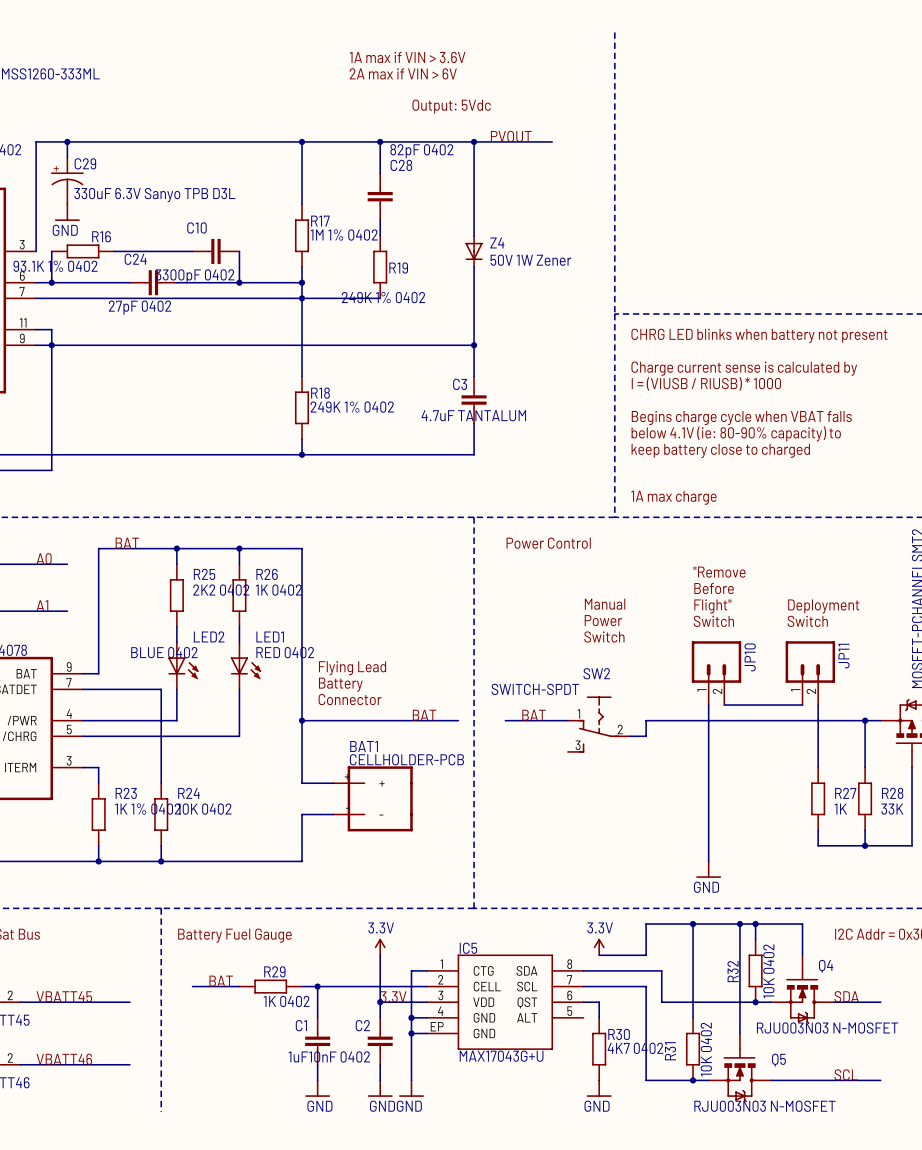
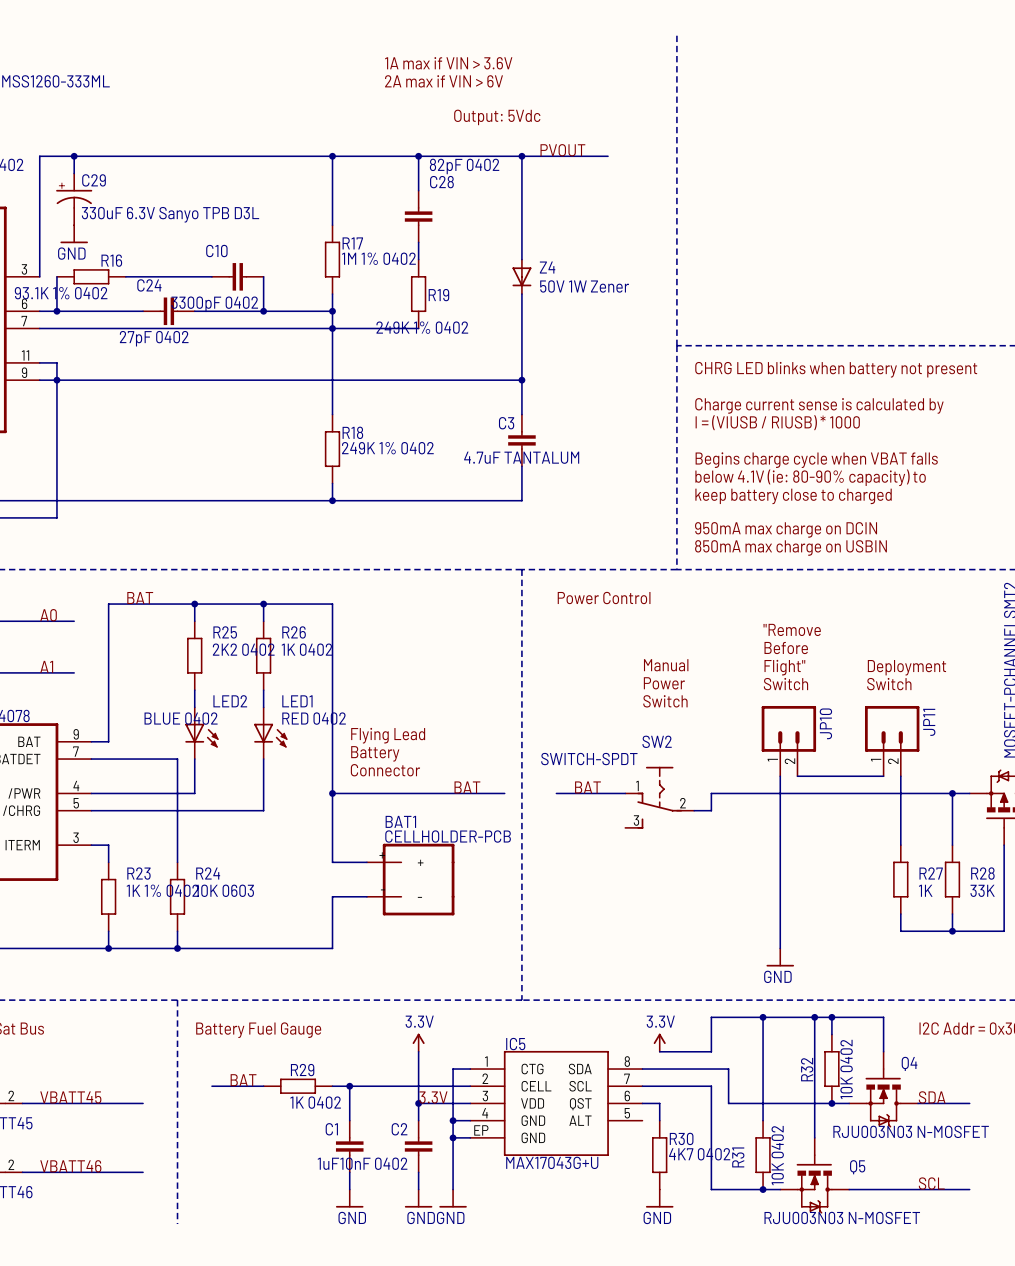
text: none -> 950mA max charge on DCIN (786, 529)
text: 1A max charge (673, 497) -> 850mA max charge on USBIN (790, 547)
R24 value: 10K 0402 (204, 809) -> 10K 0603 (224, 890)

